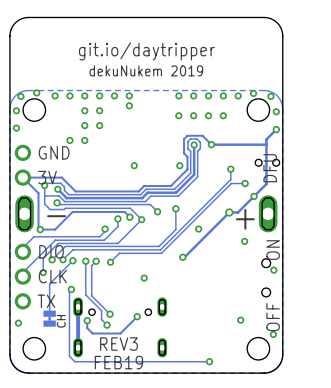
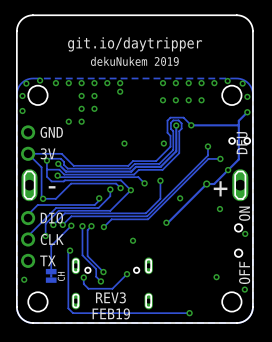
track: (78, 307) (78, 347) -> none

